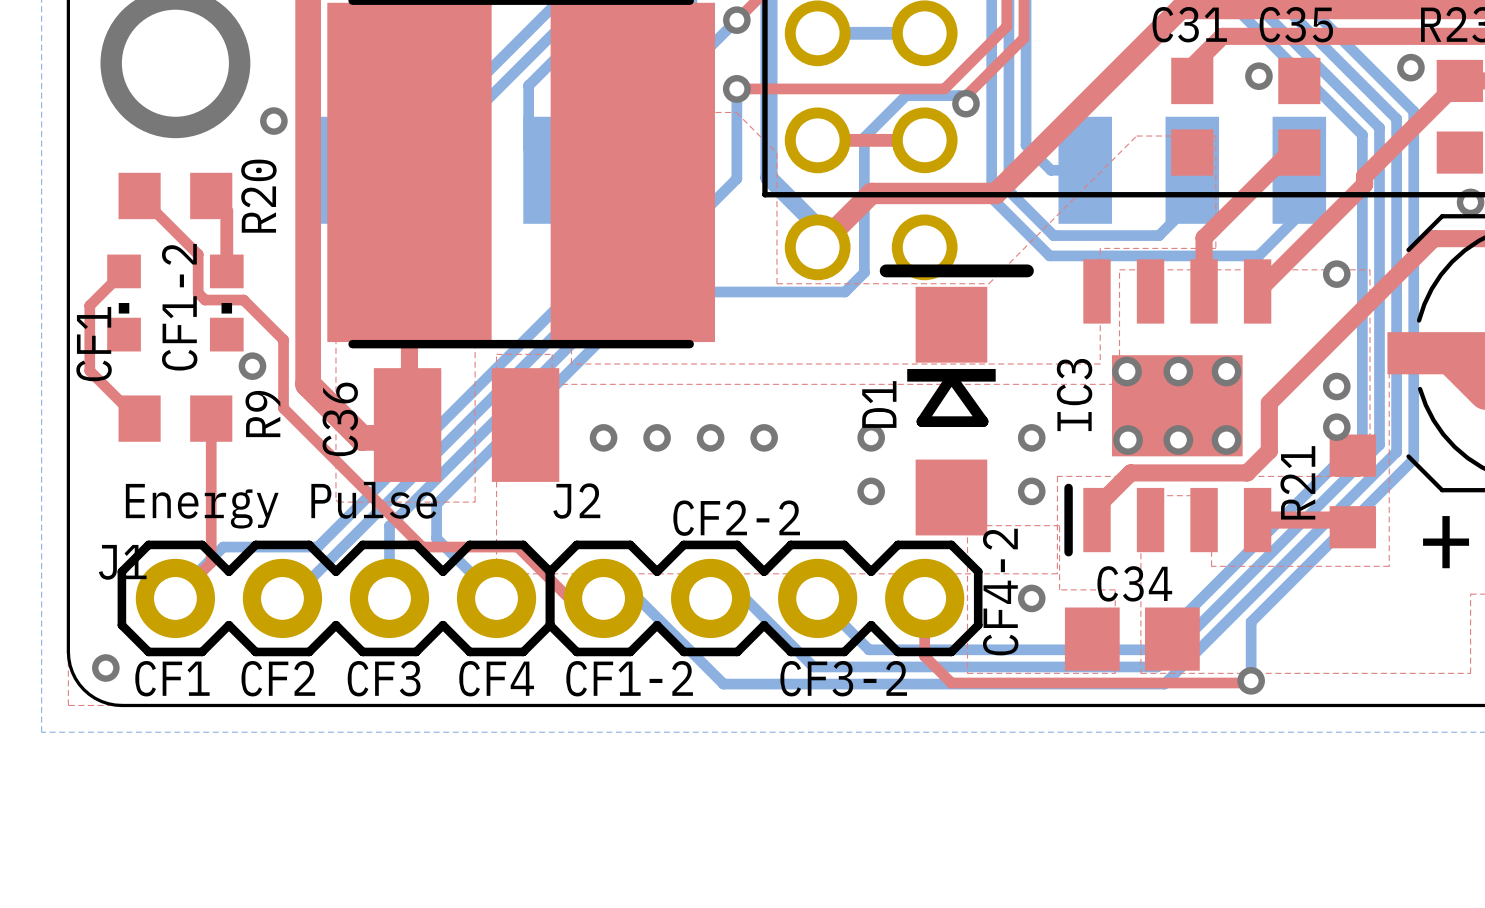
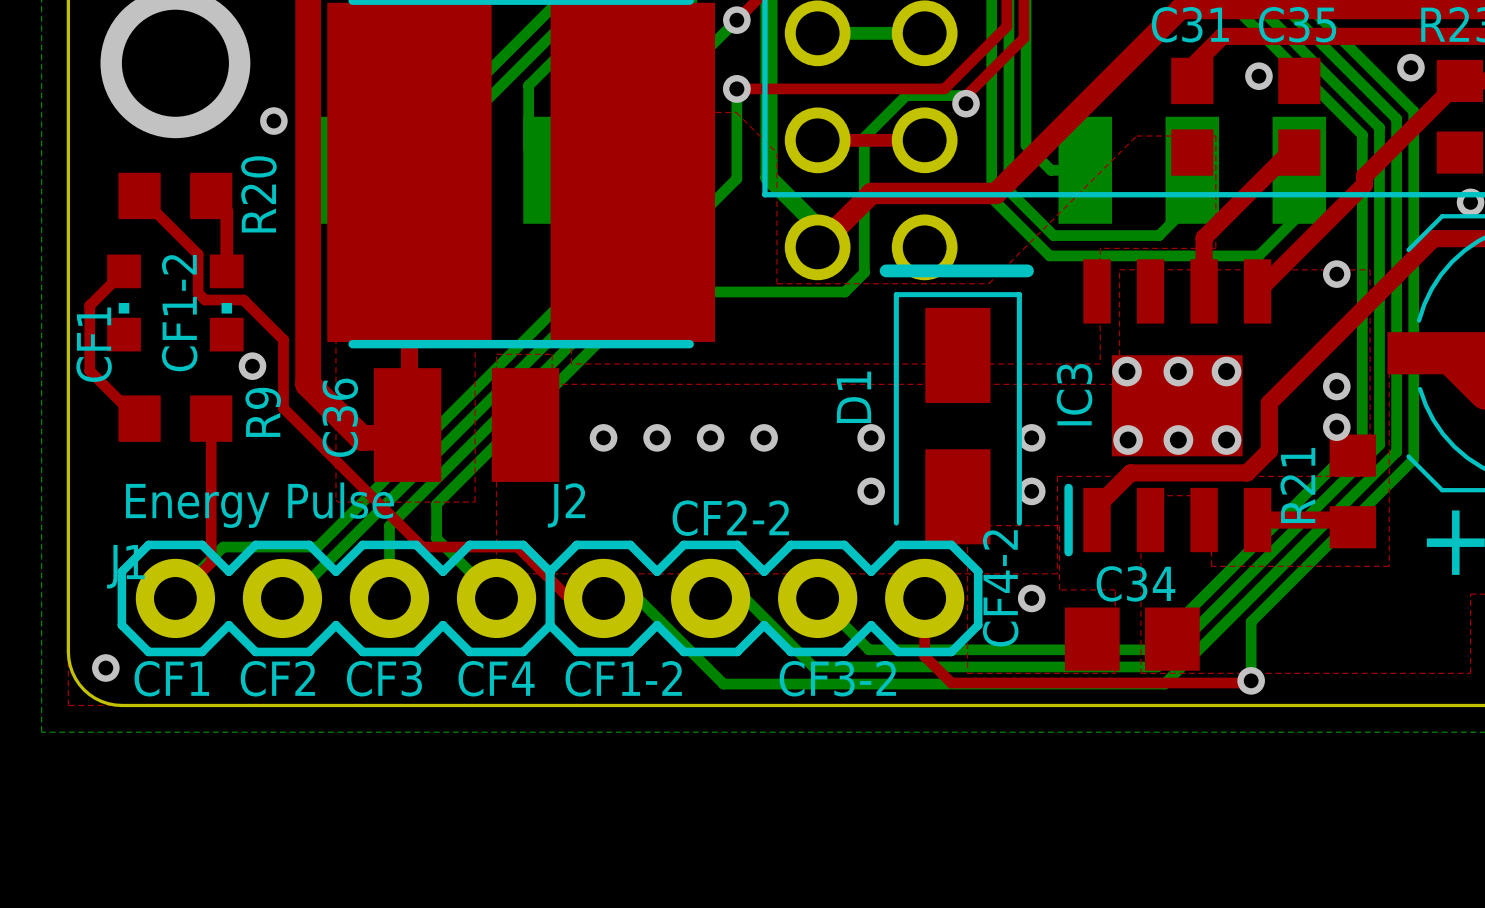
D1 footprint: [907, 286, 996, 536] -> [893, 292, 1022, 545]

